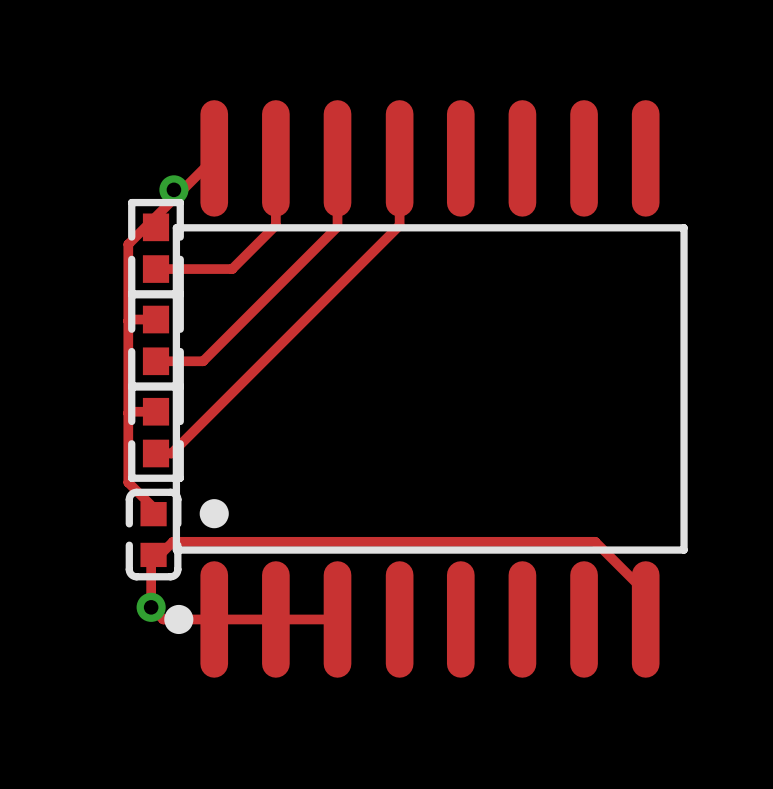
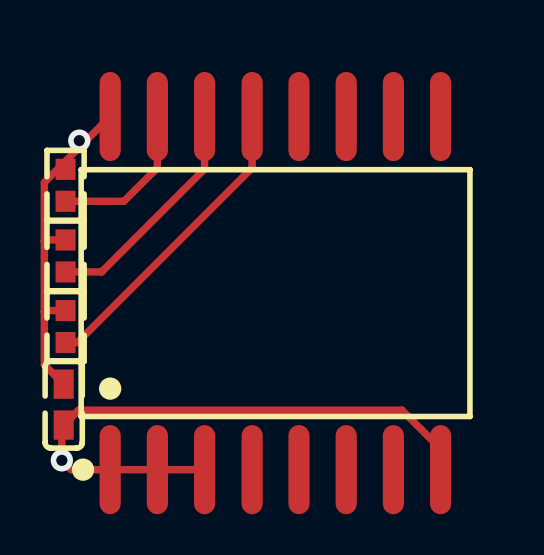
part footprint: [125, 488, 182, 581] -> [42, 358, 86, 451]

